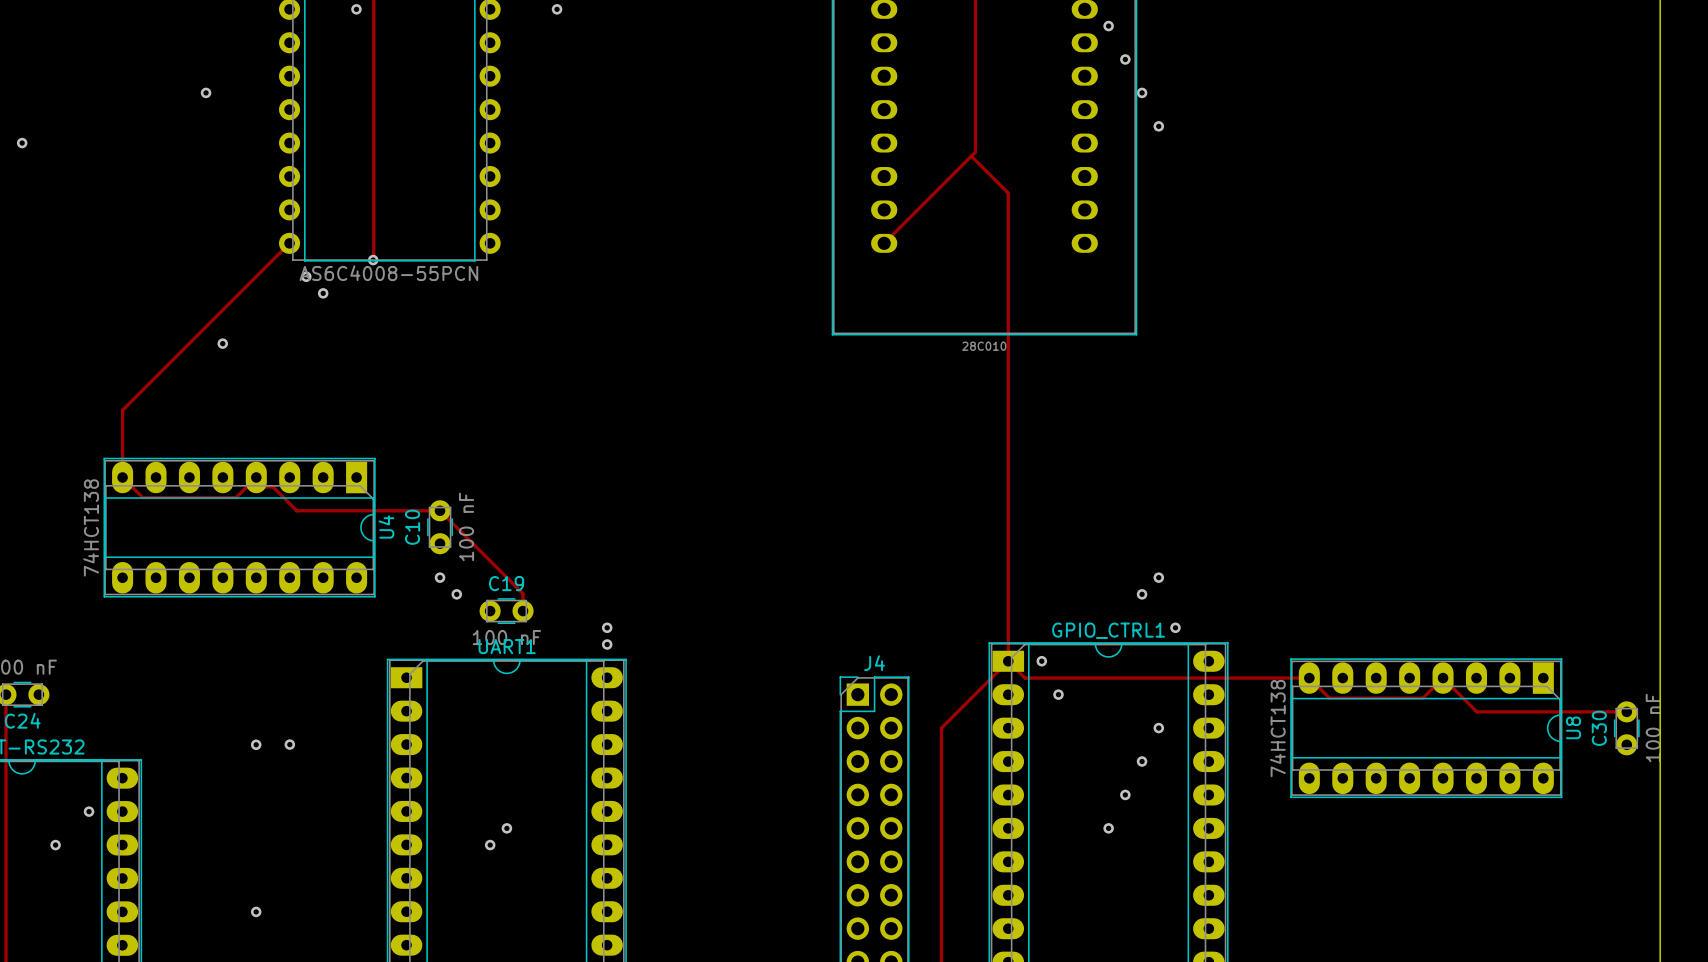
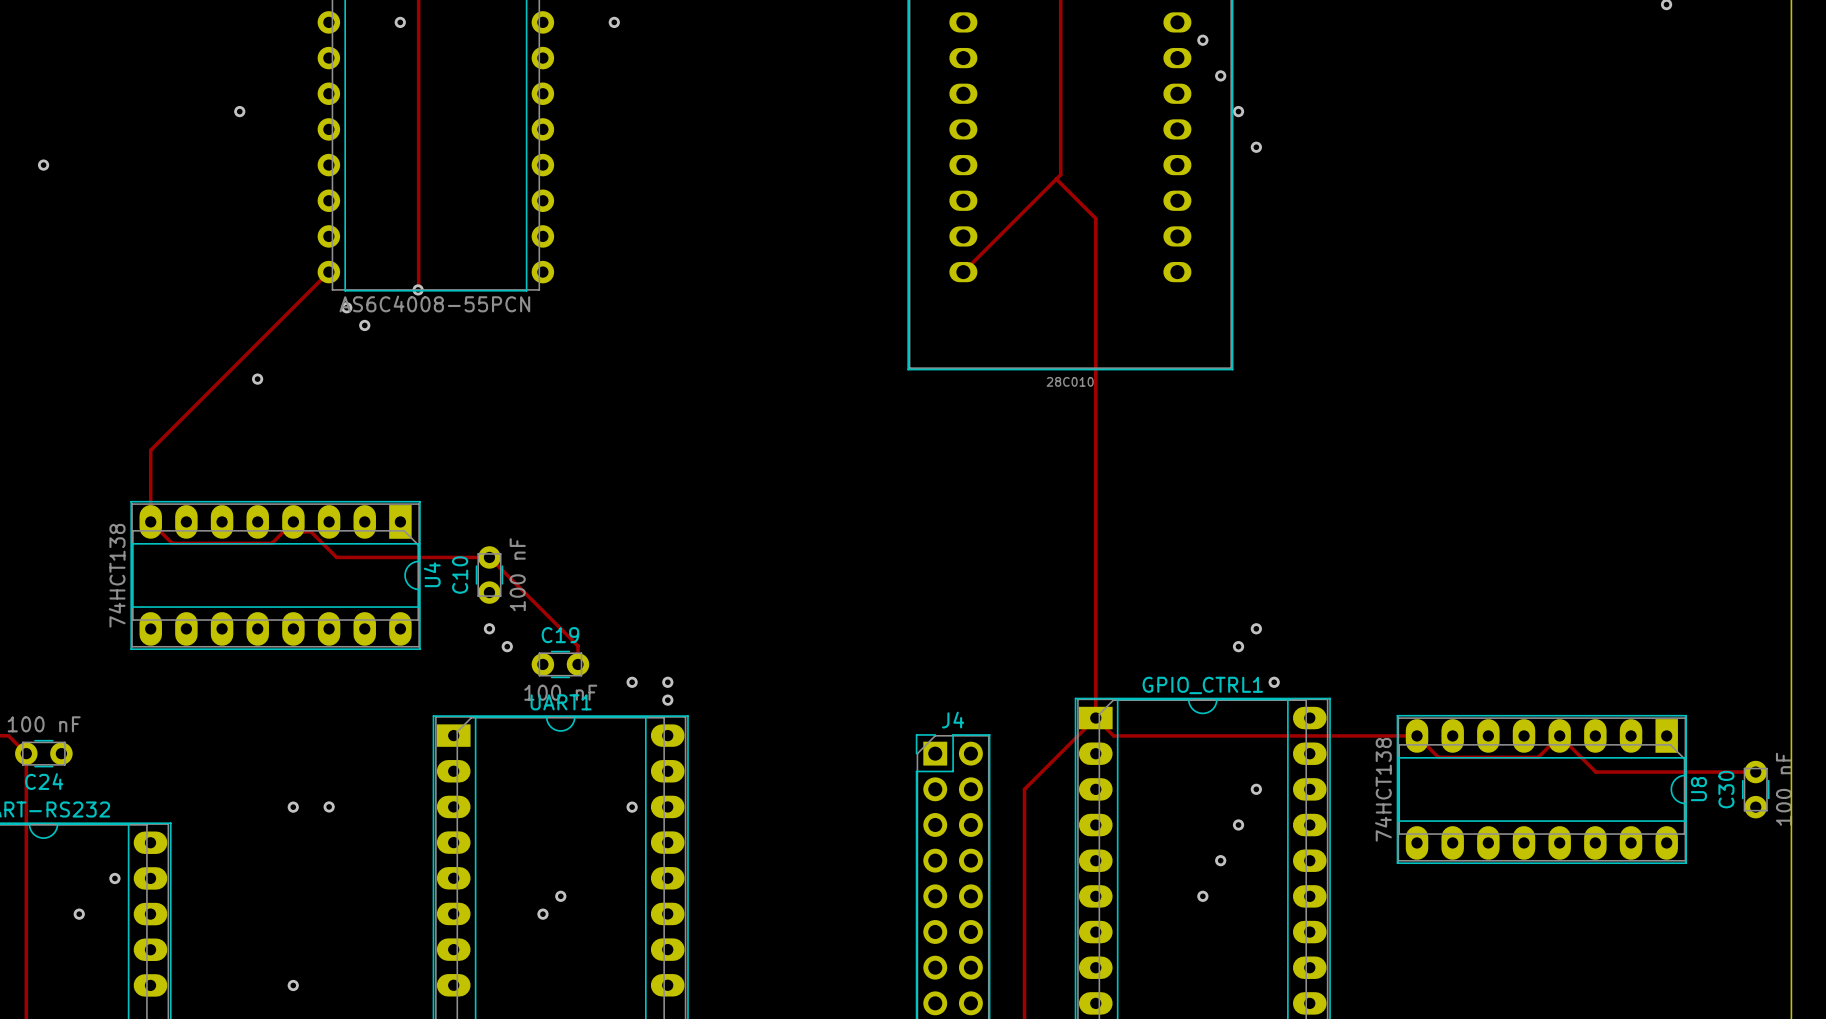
via: none -> (632, 682)
via: (1041, 661) -> none
via: (1058, 694) -> none
via: none -> (632, 807)

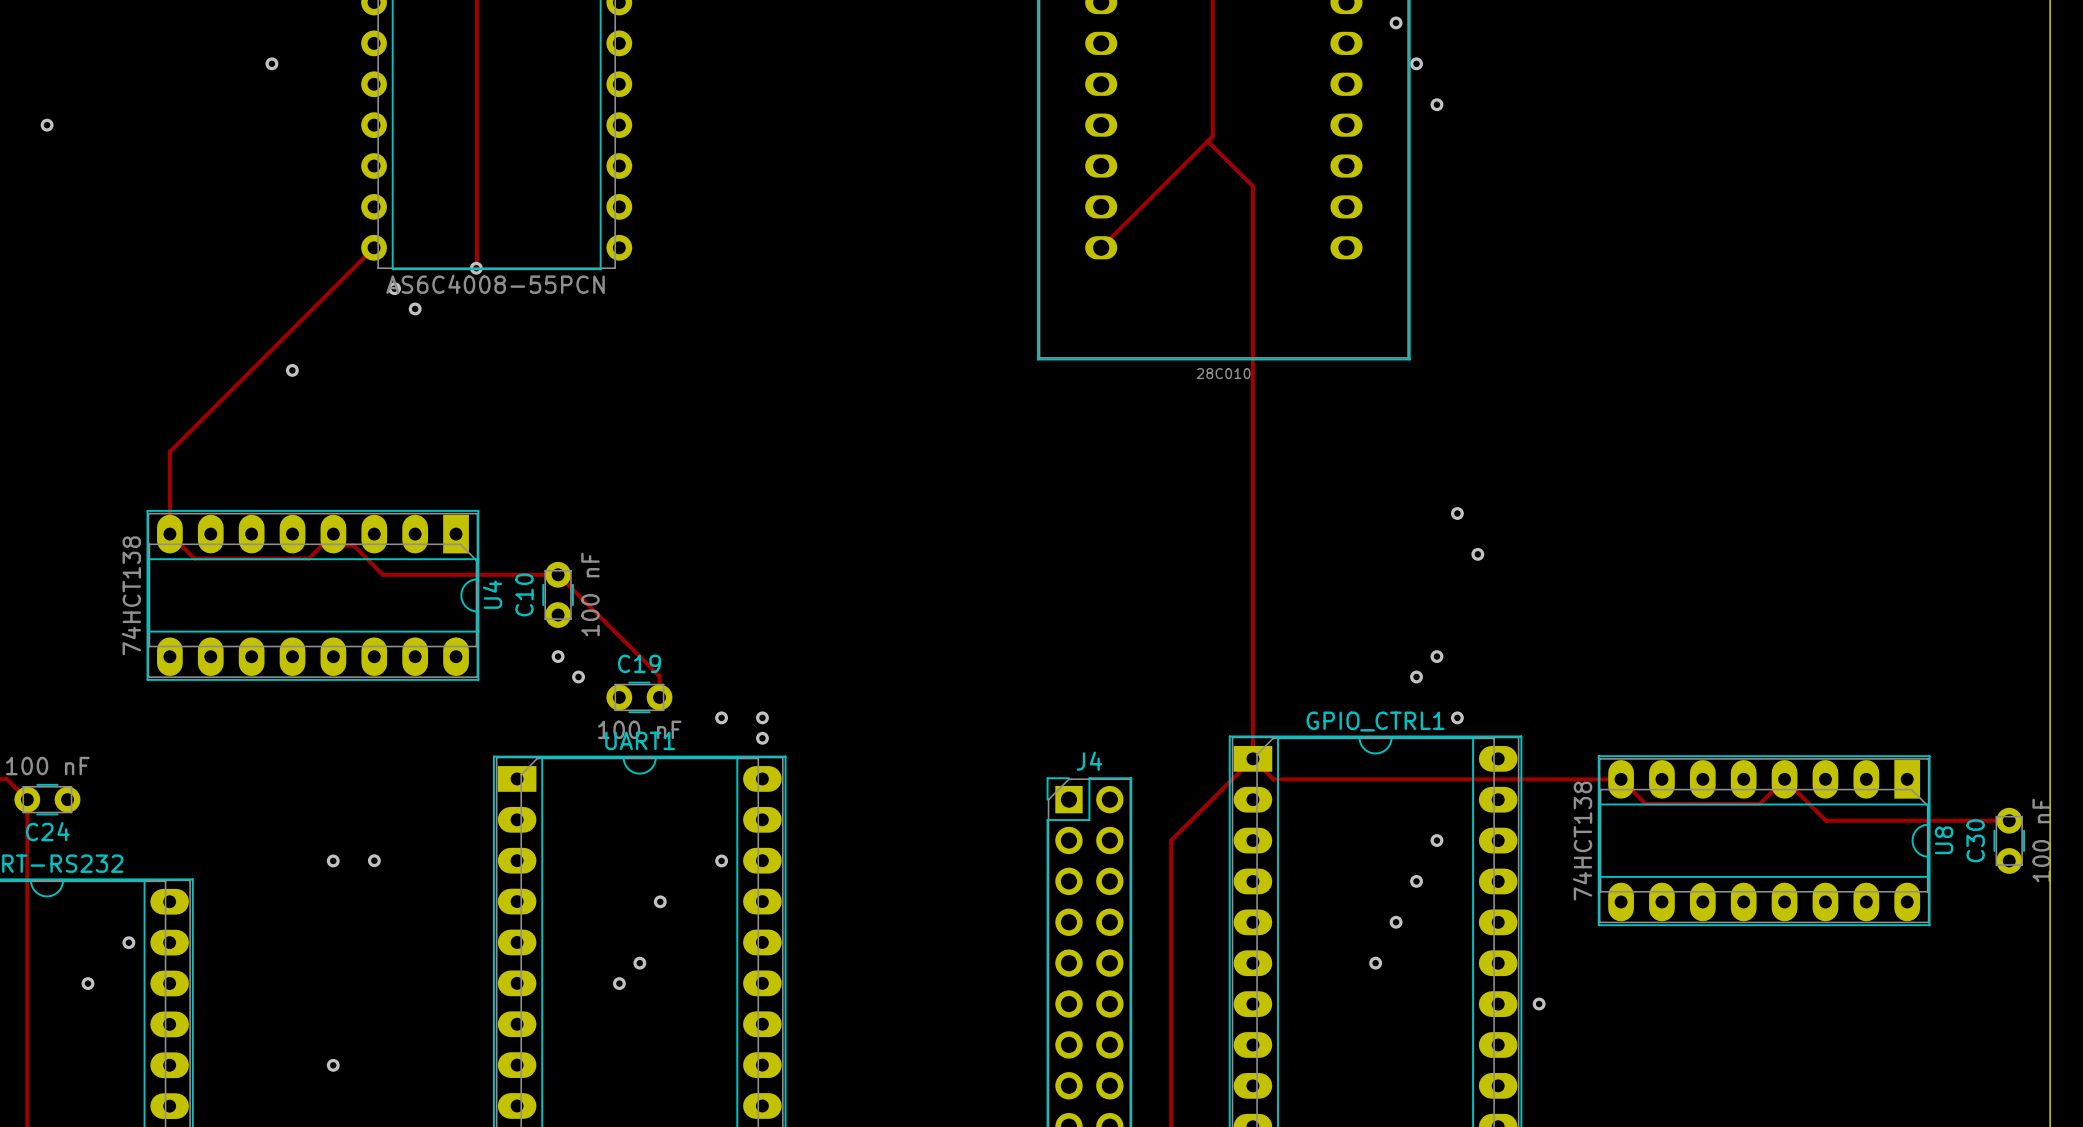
via: none -> (1457, 513)
via: none -> (1477, 554)
via: none -> (660, 901)
via: none -> (1539, 1004)

